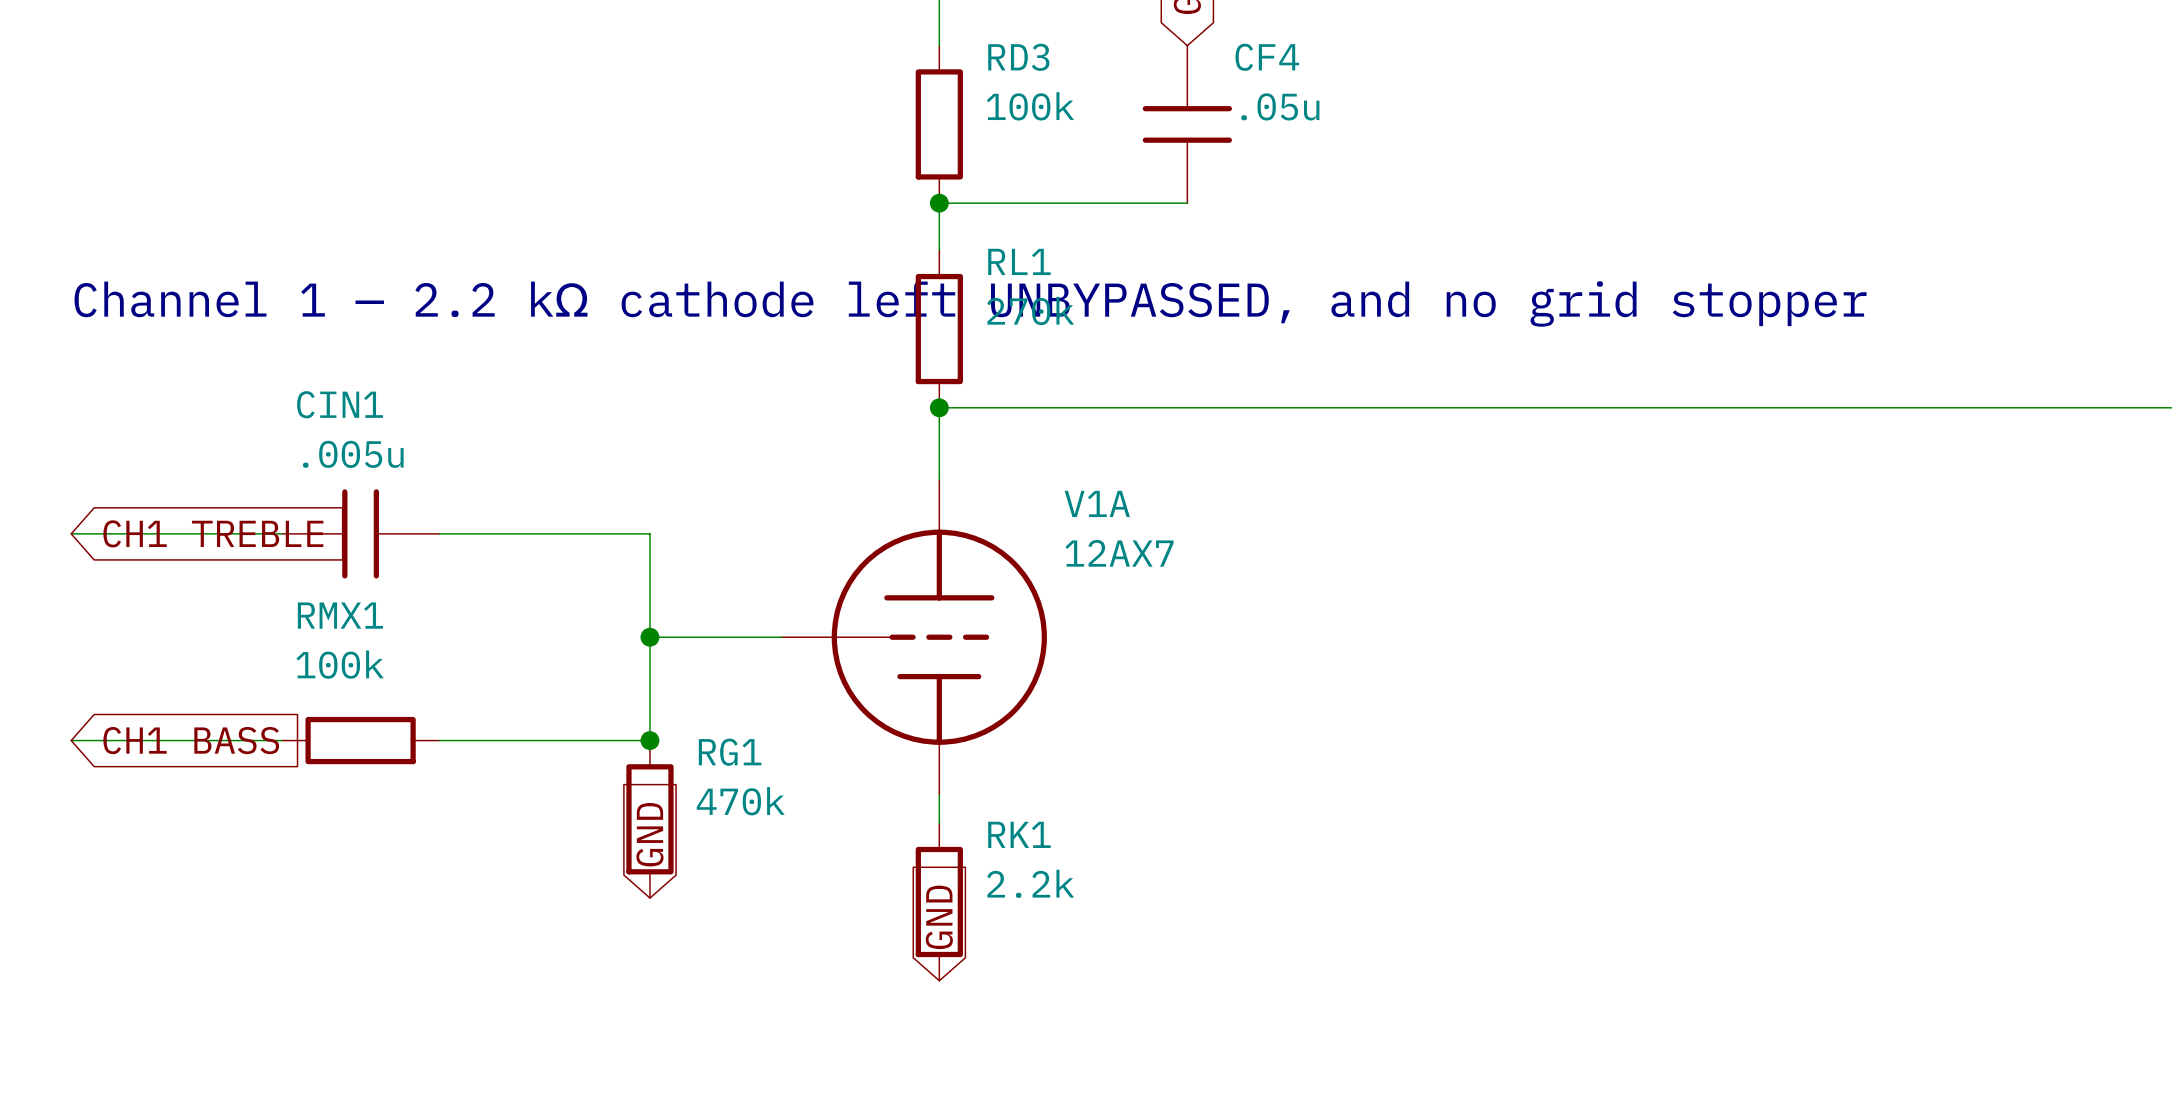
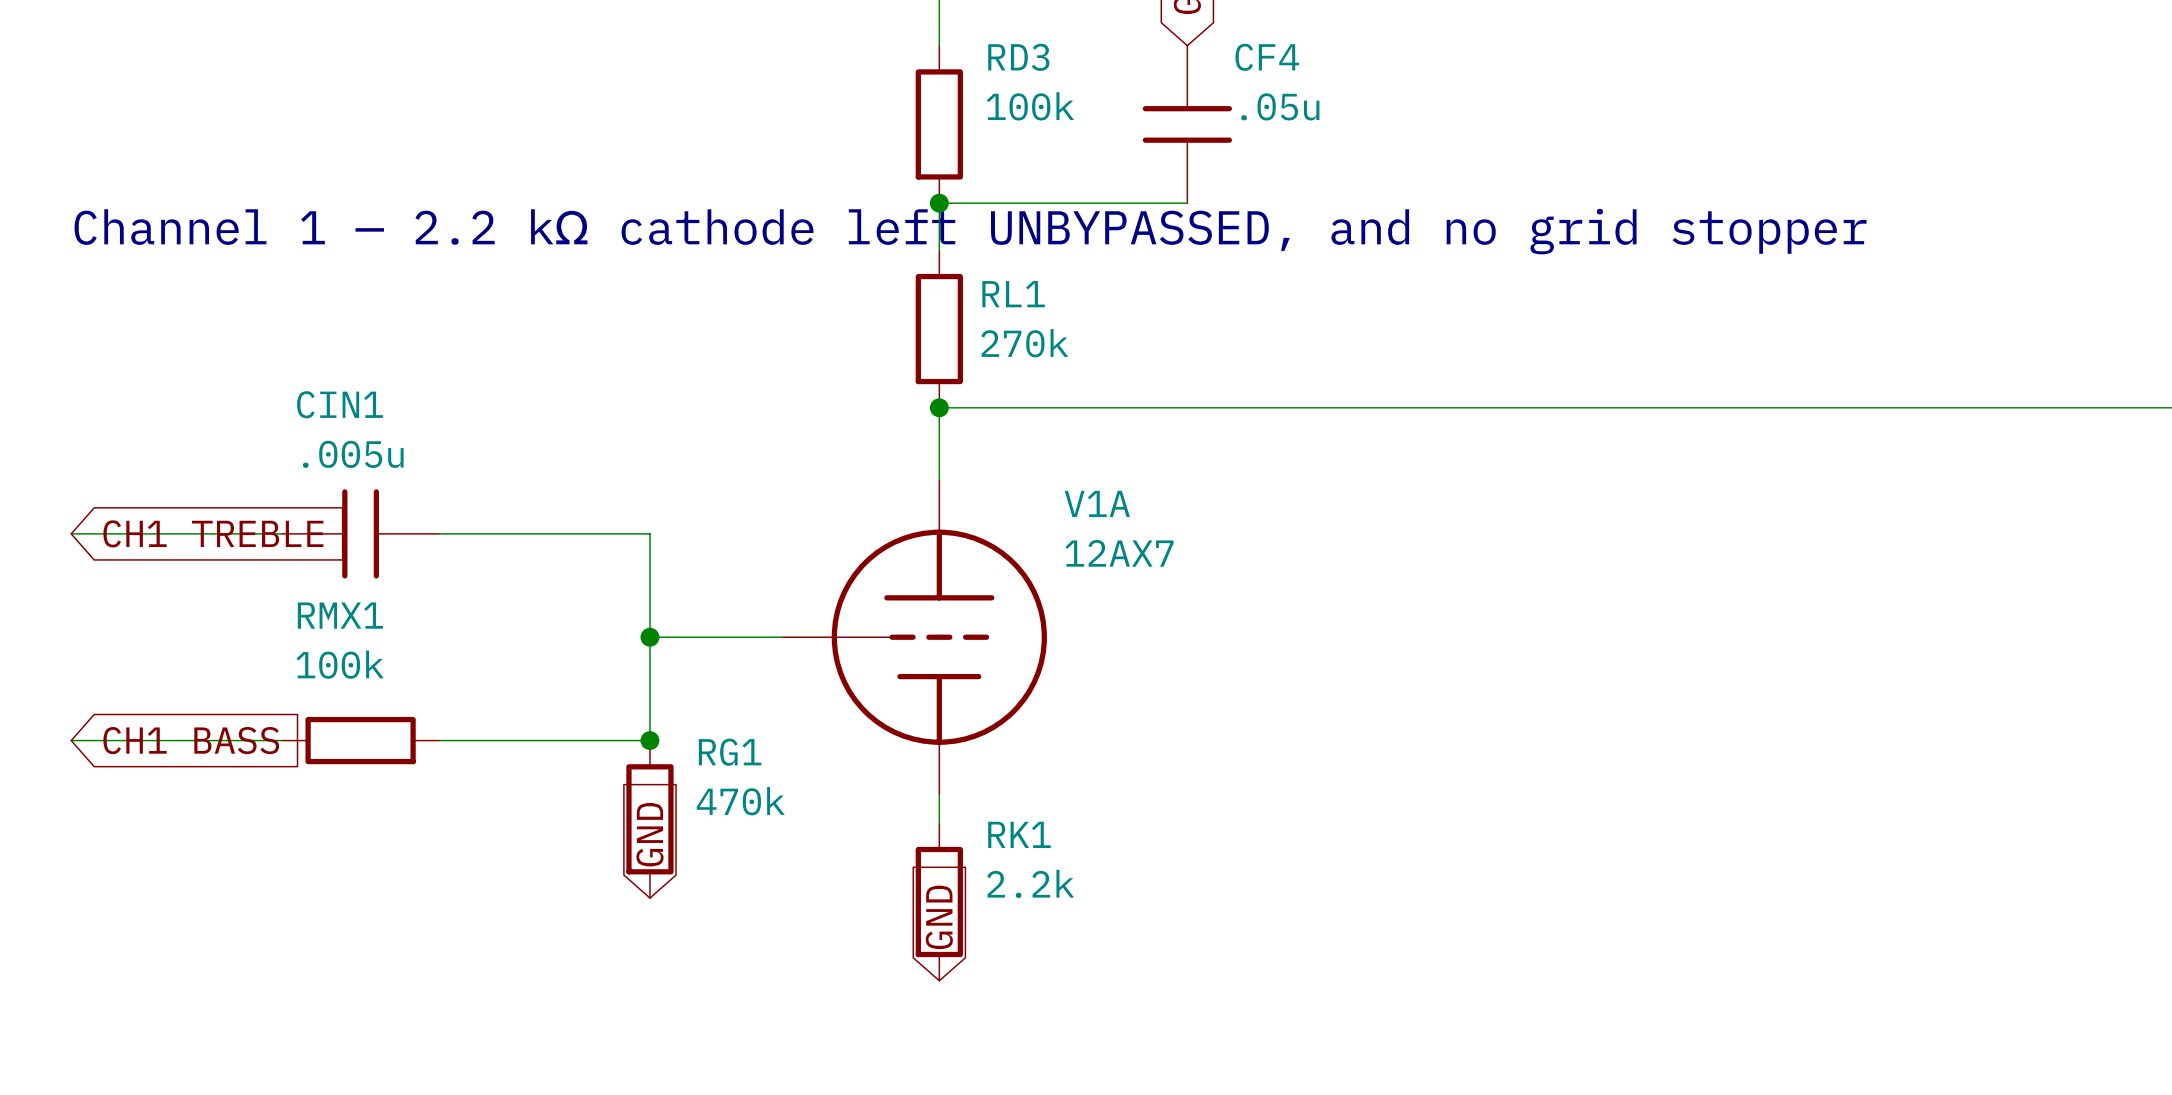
RL1 name position: RL1 (1019, 261) -> RL1 (1013, 294)
text position: Channel 1 — 2.2 kΩ cathode left UNBYPASSED, and no grid stopper (970, 303) -> Channel 1 — 2.2 kΩ cathode left UNBYPASSED, and no grid stopper (970, 231)
RL1 value position: 270k (1030, 310) -> 270k (1024, 343)

